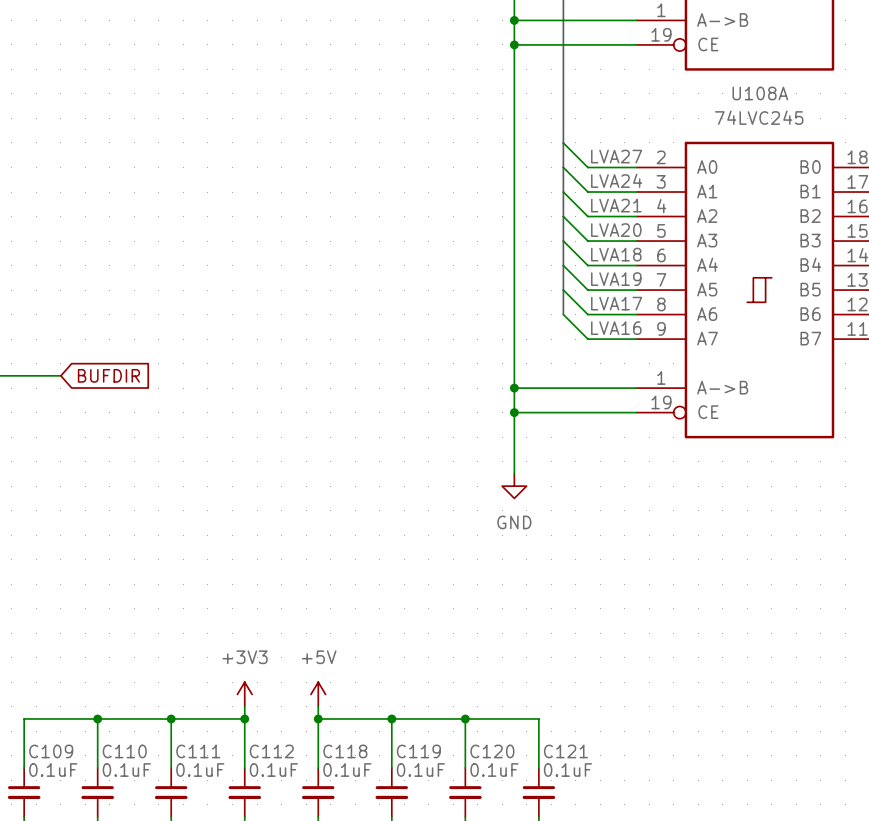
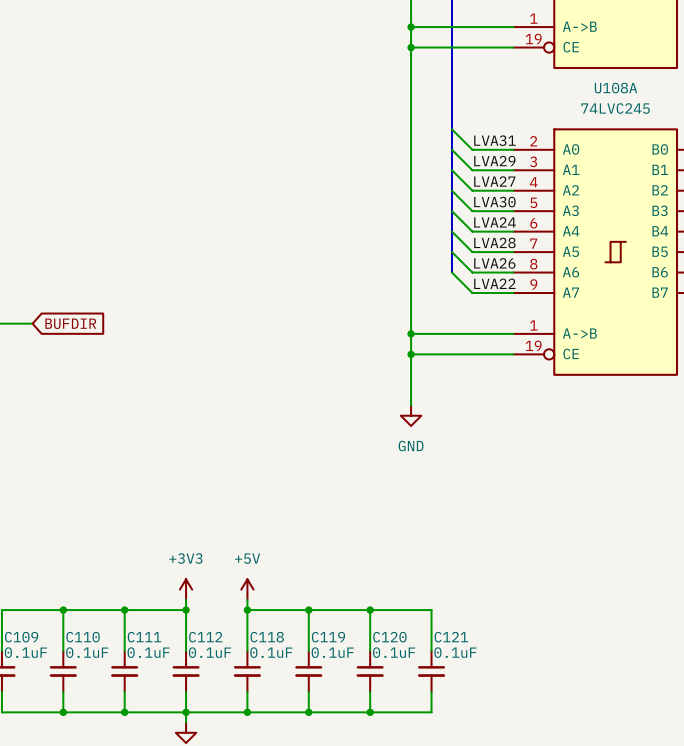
label: LVA27 (616, 156) -> LVA31 (494, 140)
label: LVA24 (616, 180) -> LVA29 (494, 161)
label: LVA21 (616, 205) -> LVA27 (494, 181)
label: LVA20 (616, 230) -> LVA30 (494, 202)
label: LVA18 (616, 254) -> LVA24 (495, 222)
label: LVA19 (616, 279) -> LVA28 (494, 242)
label: LVA17 (616, 303) -> LVA26 (494, 263)
label: LVA16 (616, 328) -> LVA22 (494, 283)

